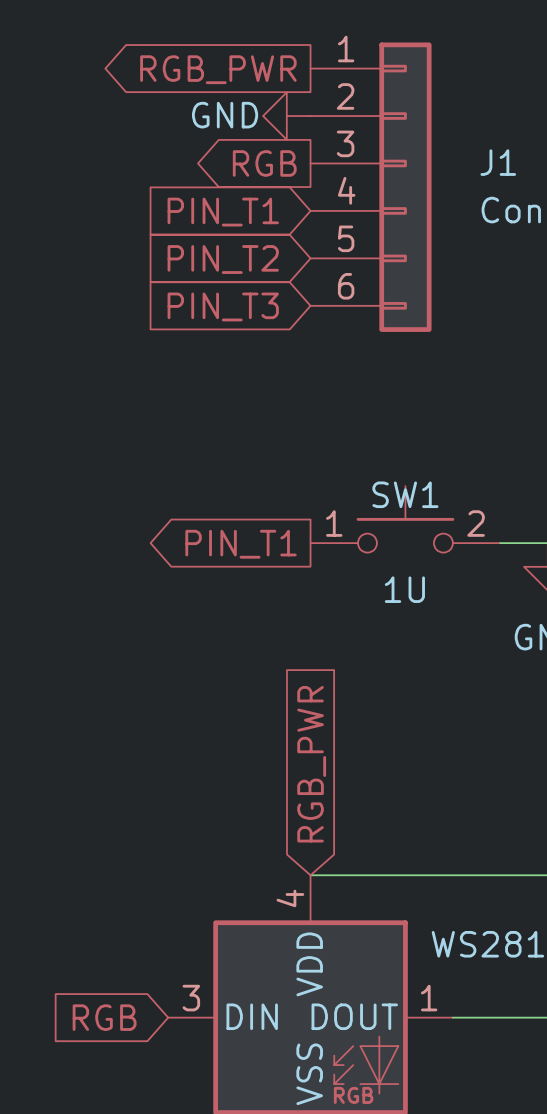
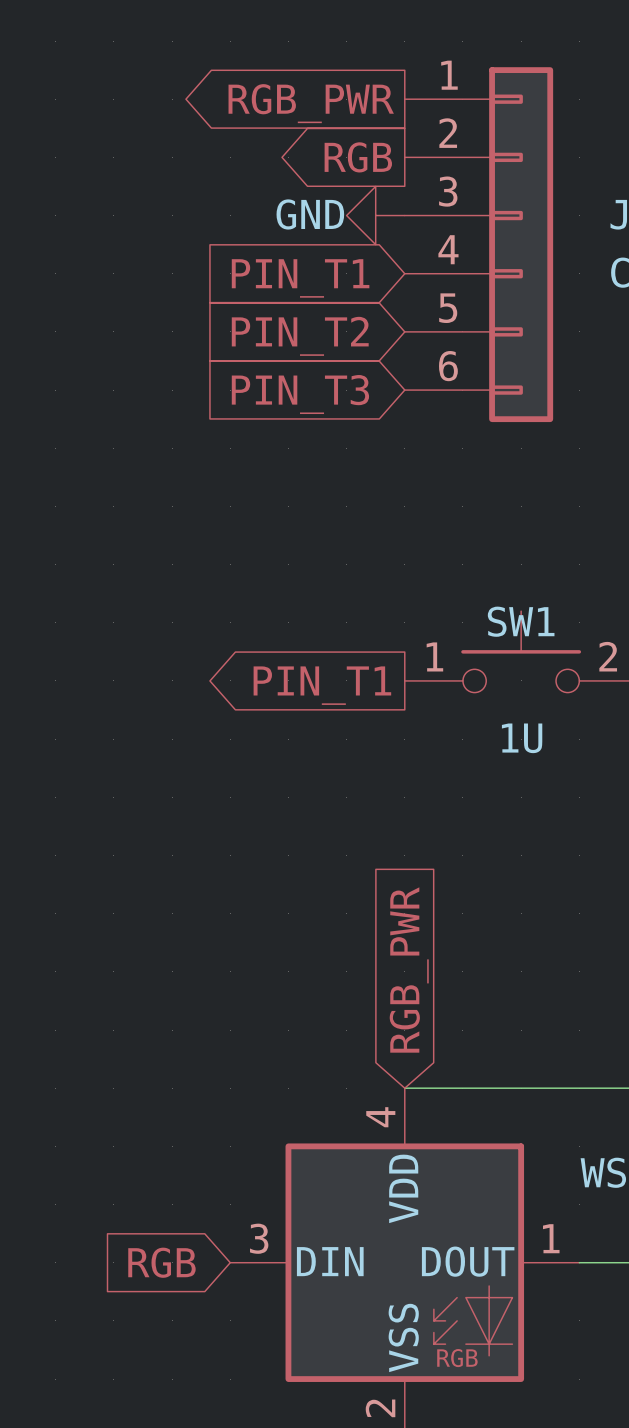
power symbol position: GND (286, 116) -> GND (375, 215)
global label position: RGB (264, 163) -> RGB (358, 157)

